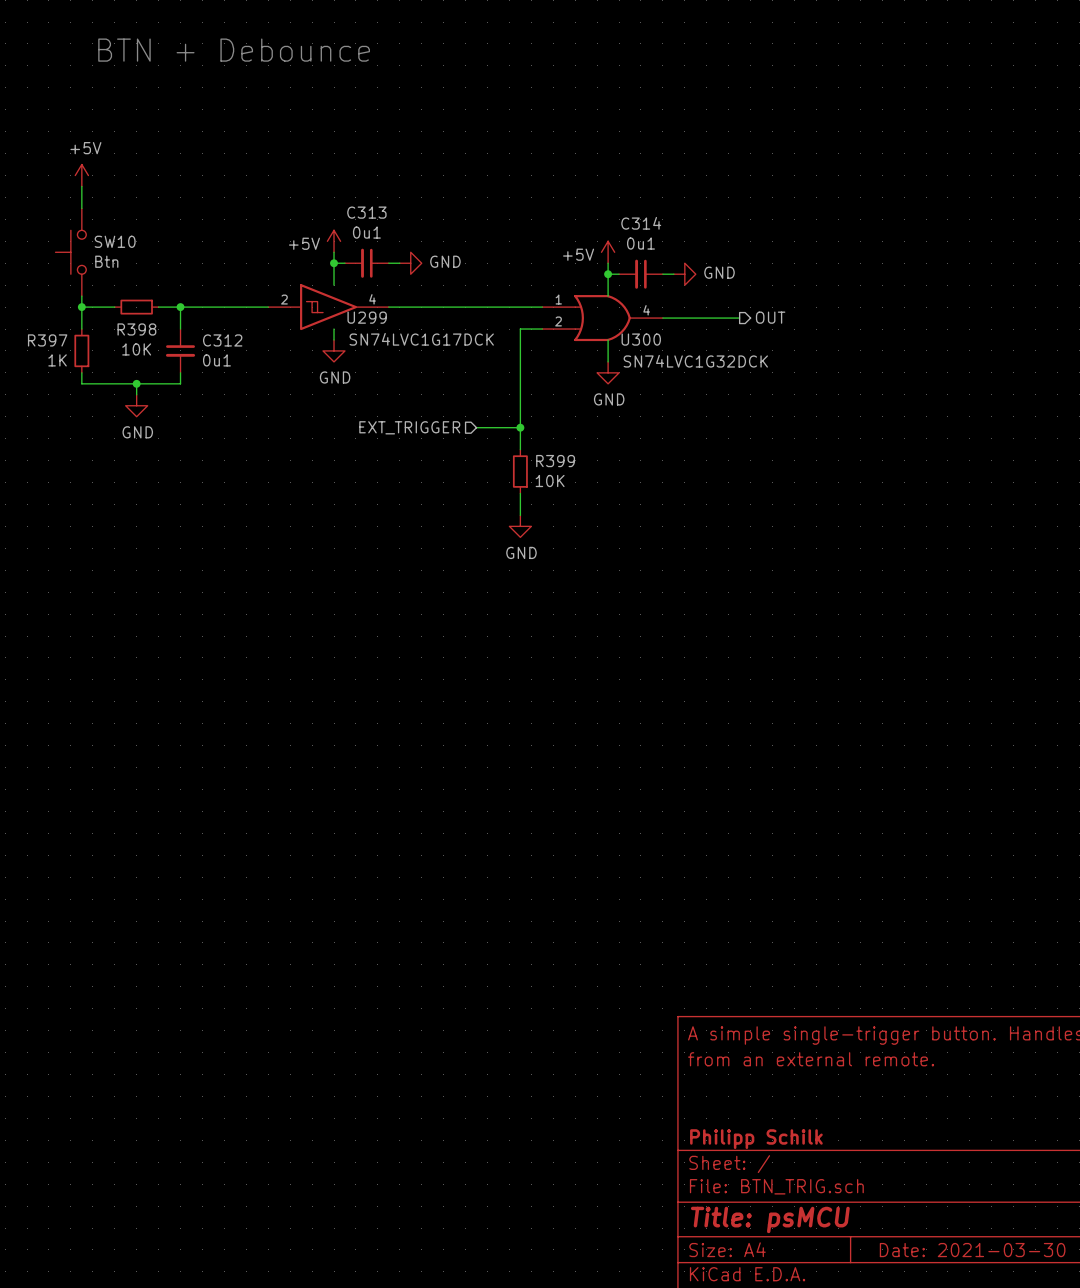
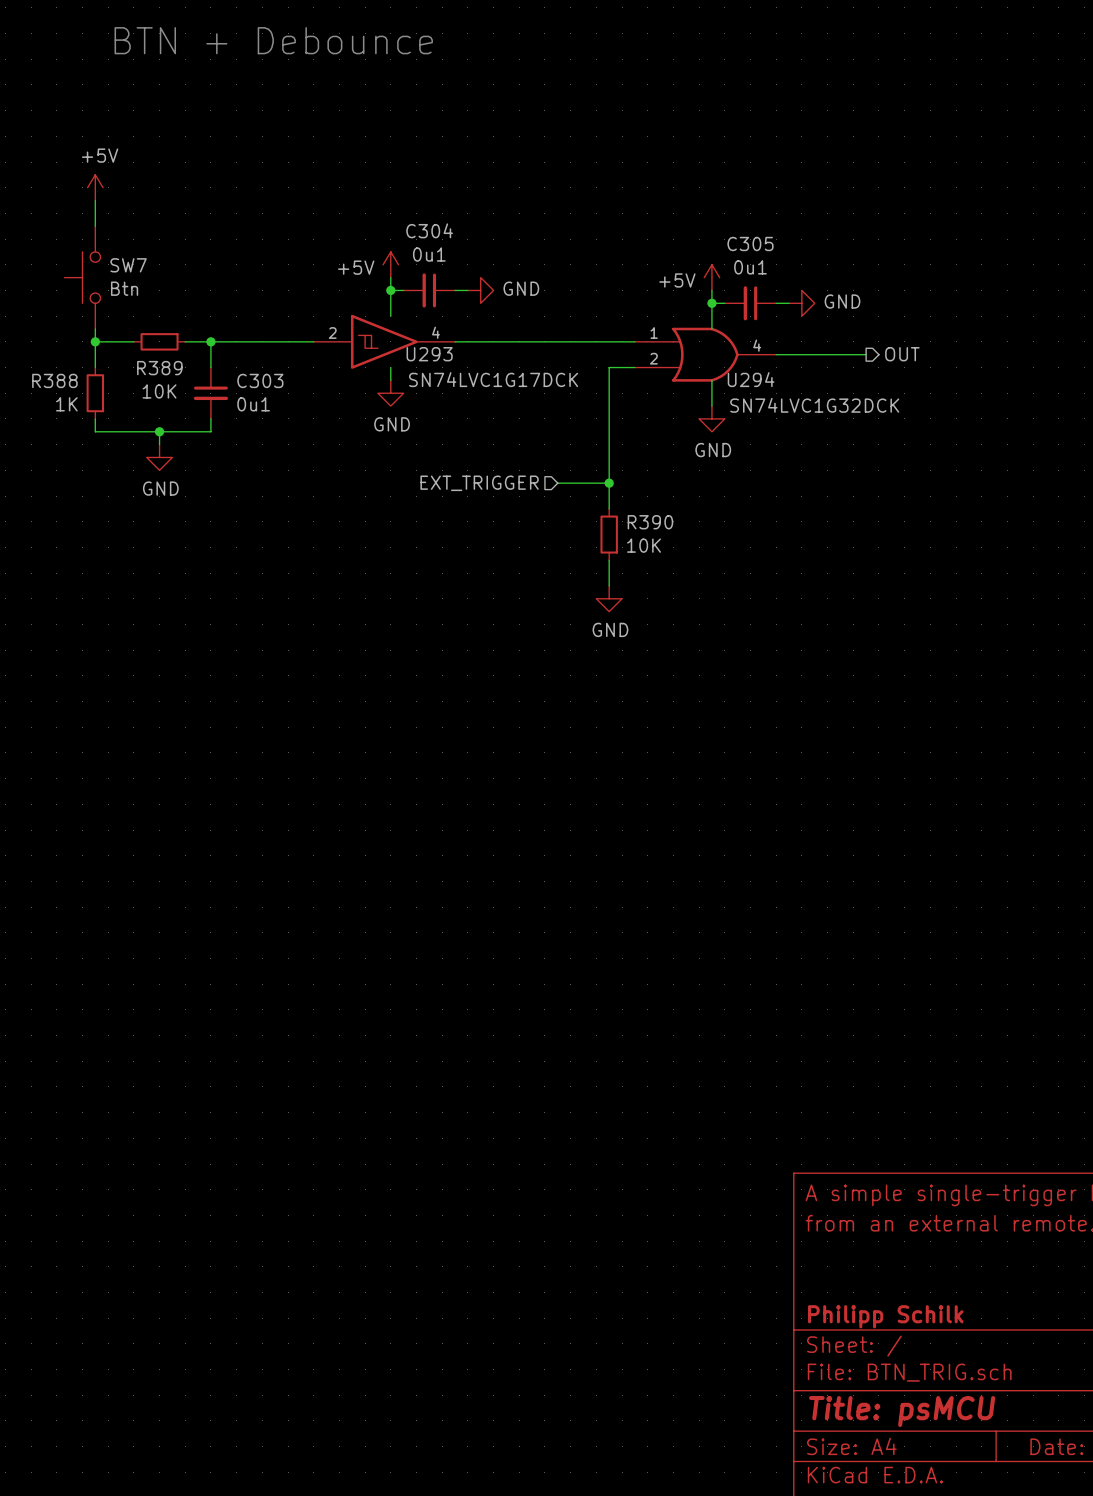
C313 name: C313 (366, 212) -> C304 (429, 230)
C314 name: C314 (641, 223) -> C305 (750, 243)
SW10 name: SW10 (115, 241) -> SW7 (128, 265)
U299 name: U299 (367, 317) -> U293 (429, 354)
R398 name: R398 (136, 329) -> R389 (159, 368)
U300 name: U300 (641, 339) -> U294 (751, 379)
R397 name: R397 (47, 340) -> R388 (54, 380)
C312 name: C312 (222, 340) -> C303 (260, 380)
R399 name: R399 (555, 461) -> R390 (650, 522)

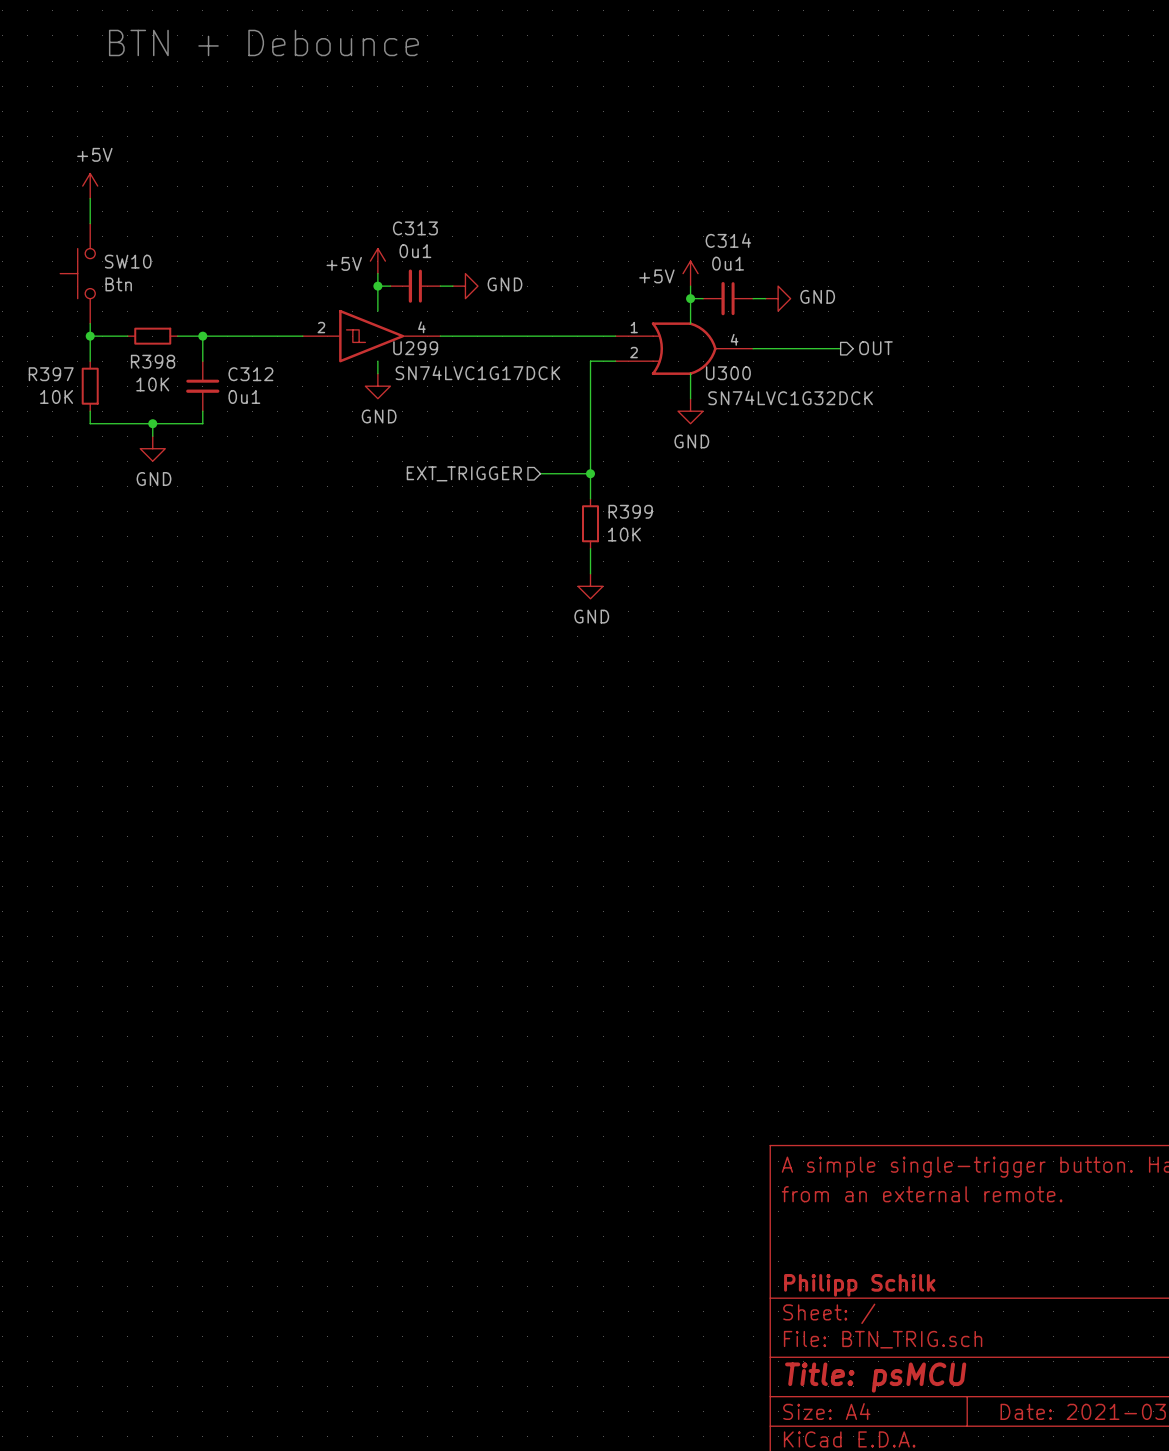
C304 name: C304 (429, 230) -> C313 (415, 228)
C305 name: C305 (750, 243) -> C314 (728, 240)
SW7 name: SW7 (128, 265) -> SW10 (128, 261)
U293 name: U293 (429, 354) -> U299 (415, 348)
R389 name: R389 (159, 368) -> R398 (153, 361)
U294 name: U294 (751, 379) -> U300 (728, 373)
R388 name: R388 (54, 380) -> R397 (51, 374)
C303 name: C303 (260, 380) -> C312 (250, 374)
R388 value: 1K (66, 404) -> 10K (56, 396)
R390 name: R390 (650, 522) -> R399 (630, 511)

